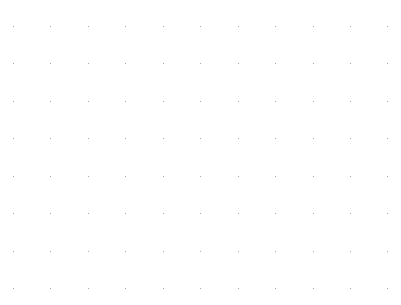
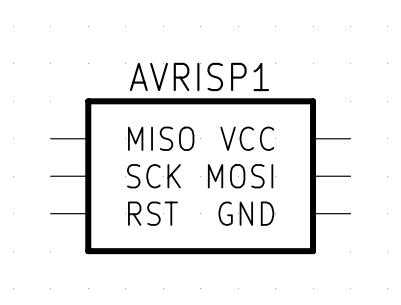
AVRISP1: none -> (200, 176)

